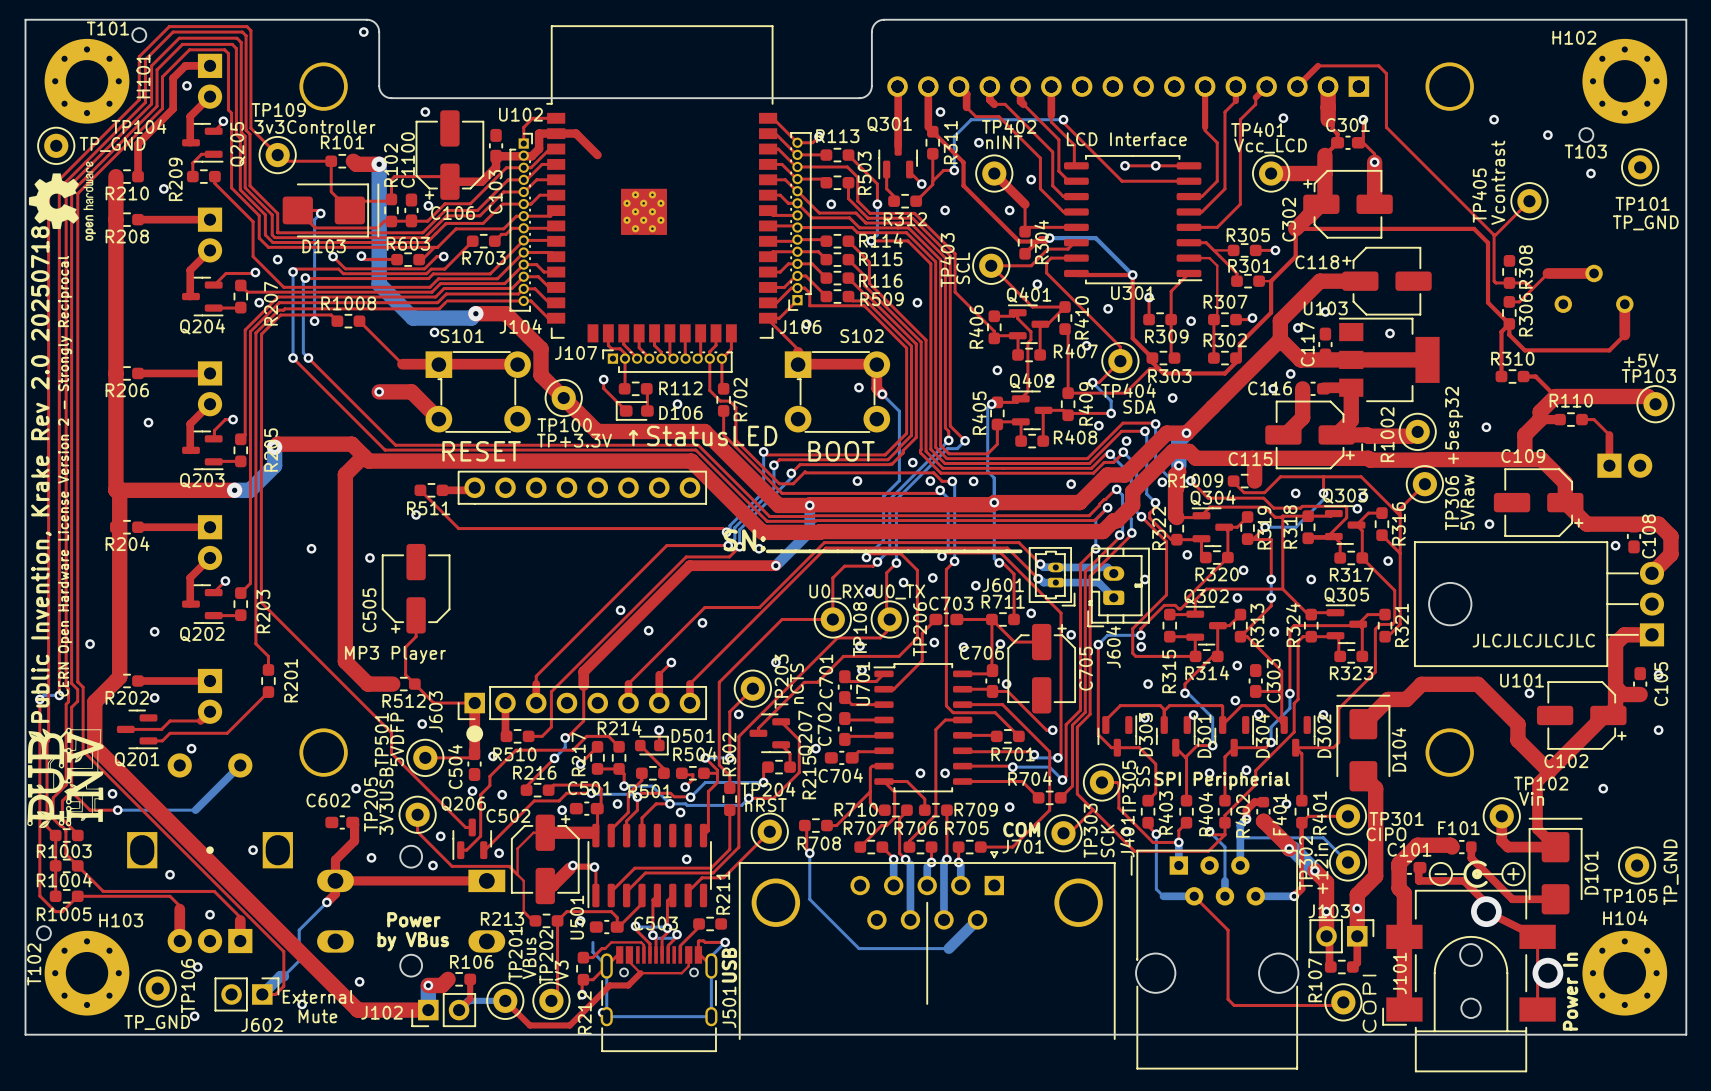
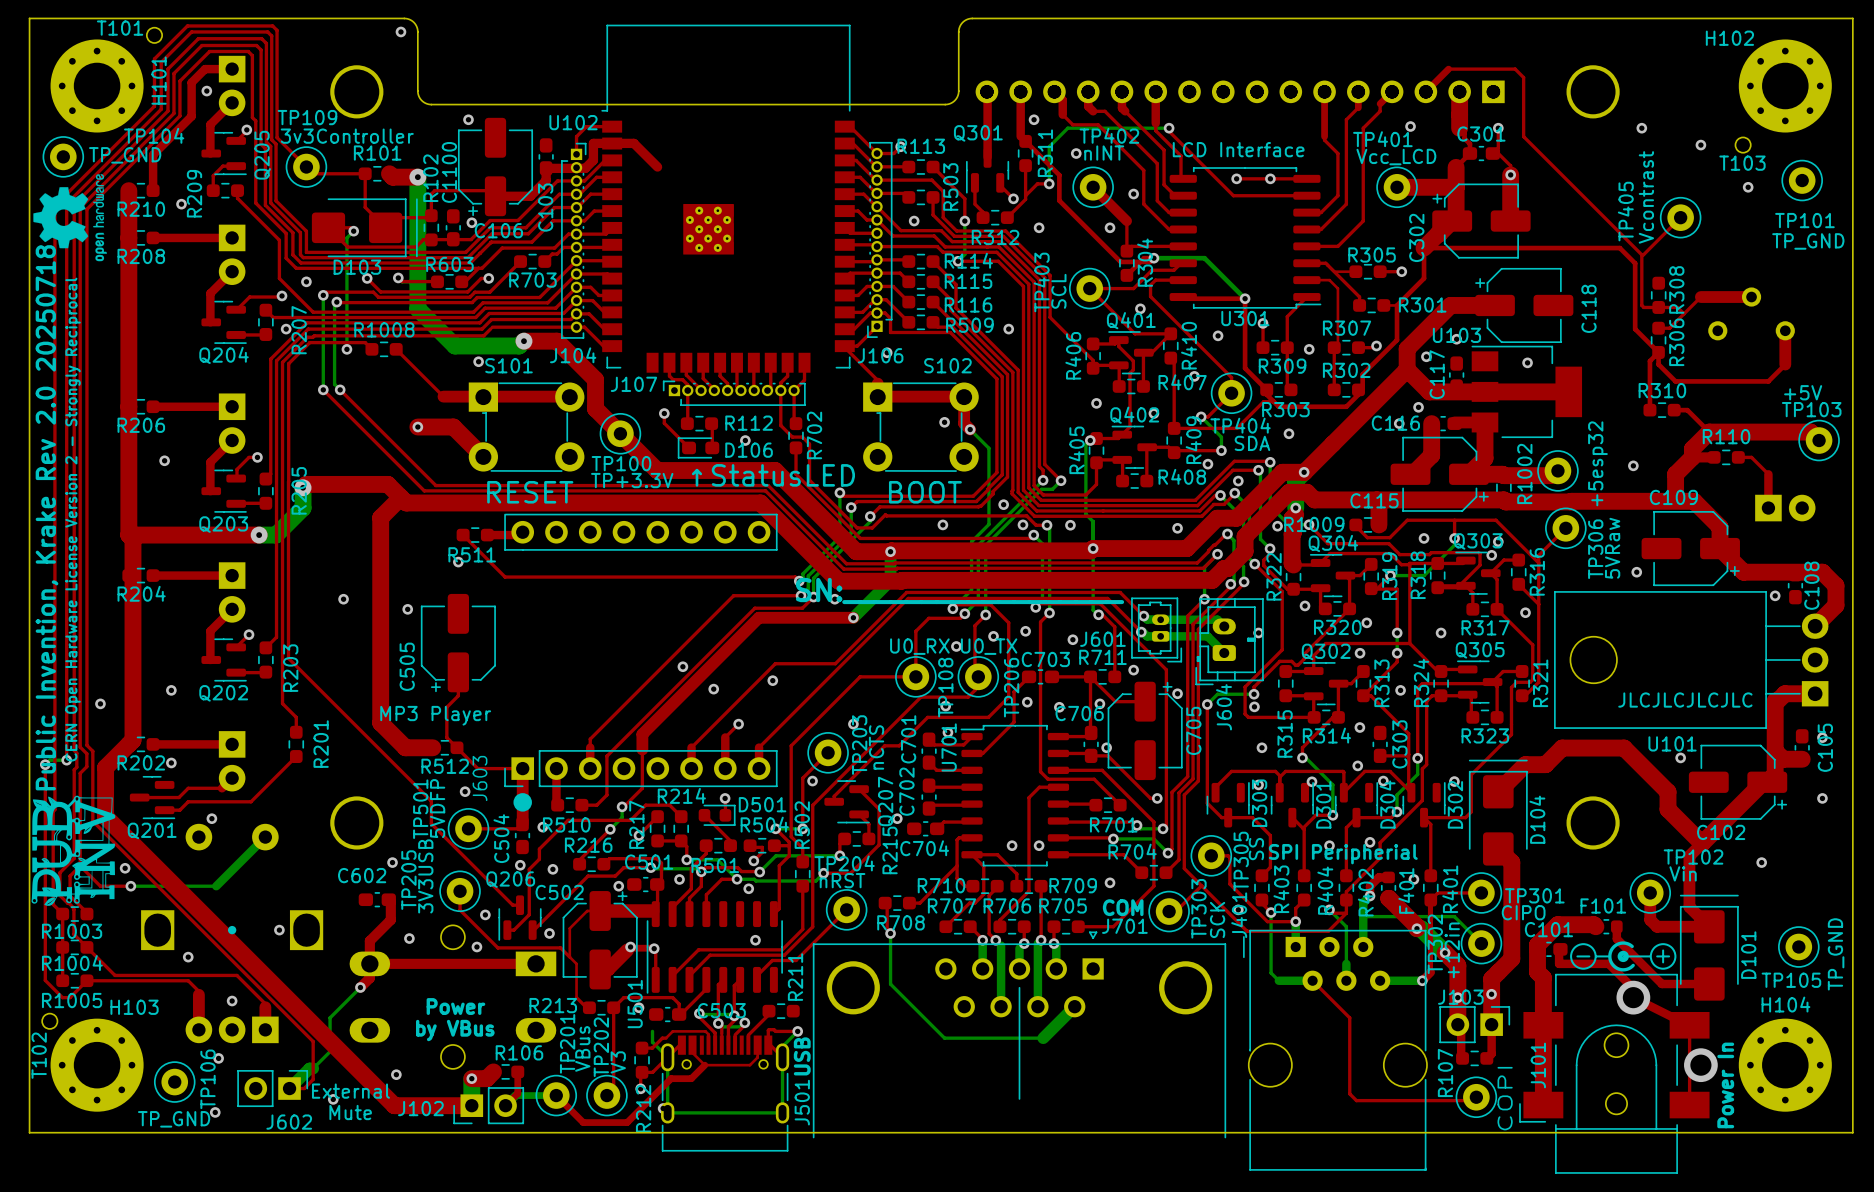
C118 name rotation: 0° (1317, 262) -> 90° counterclockwise (1588, 308)
C118 name position: C118 (1317, 262) -> C118 (1588, 308)
R301 name position: R301 (1249, 265) -> R301 (1422, 304)

